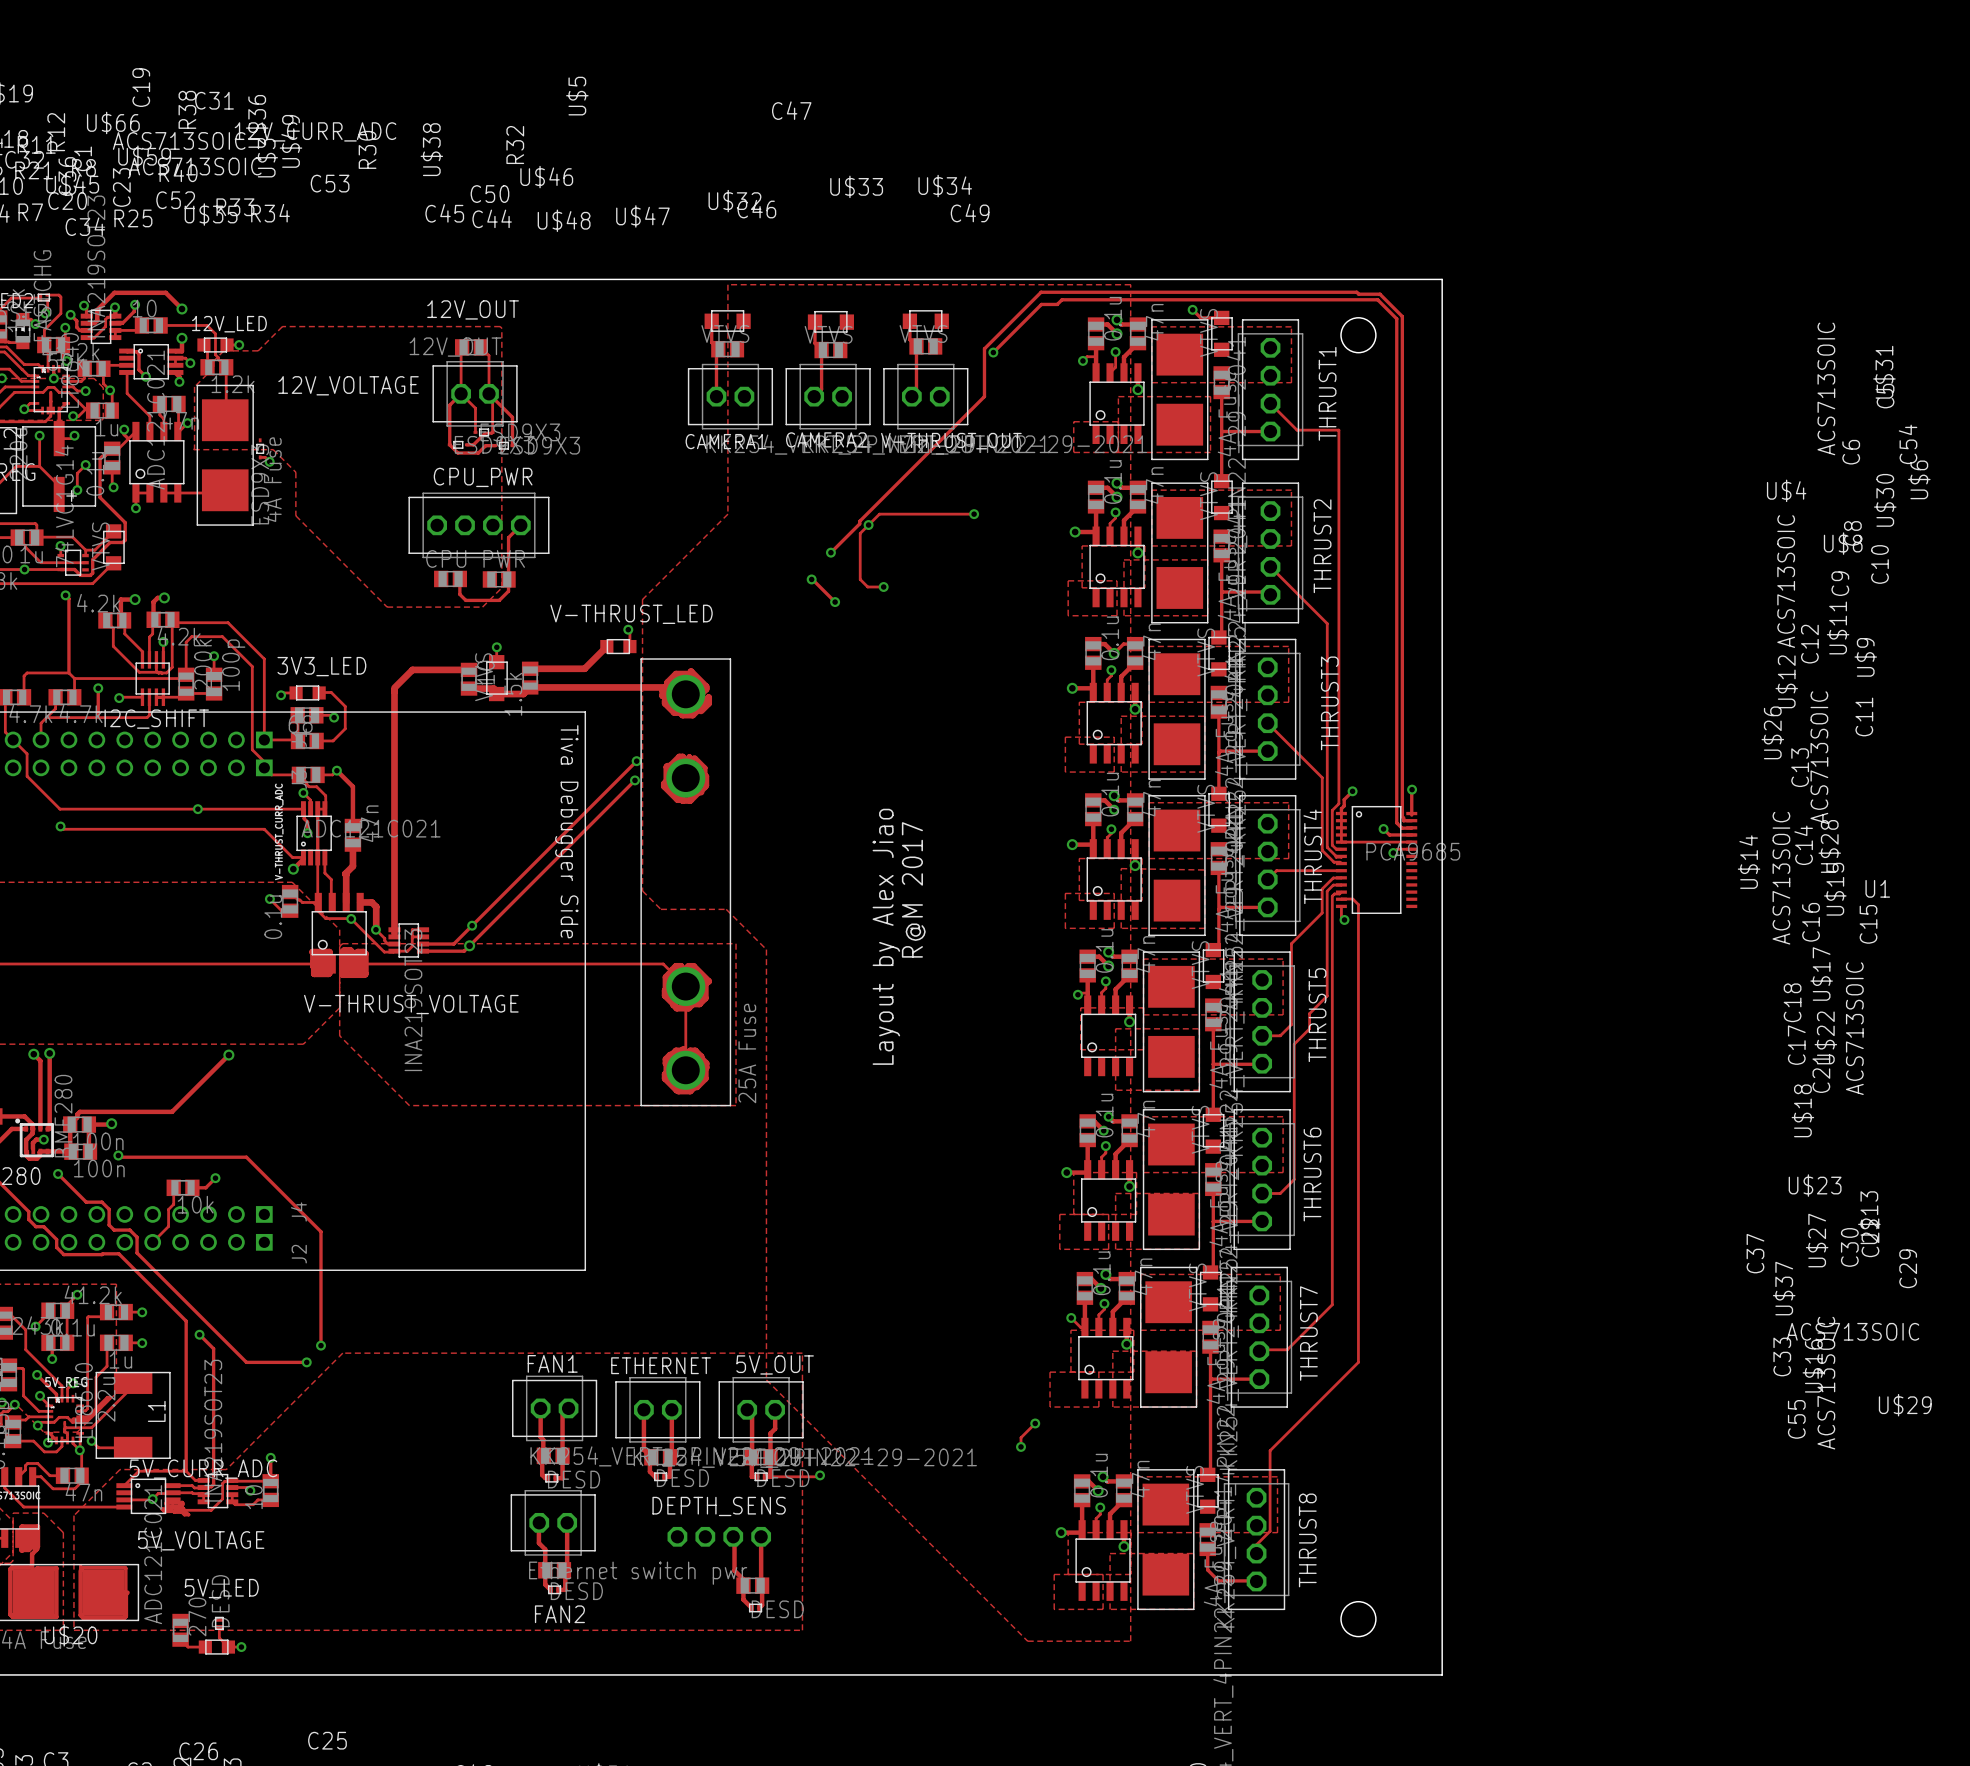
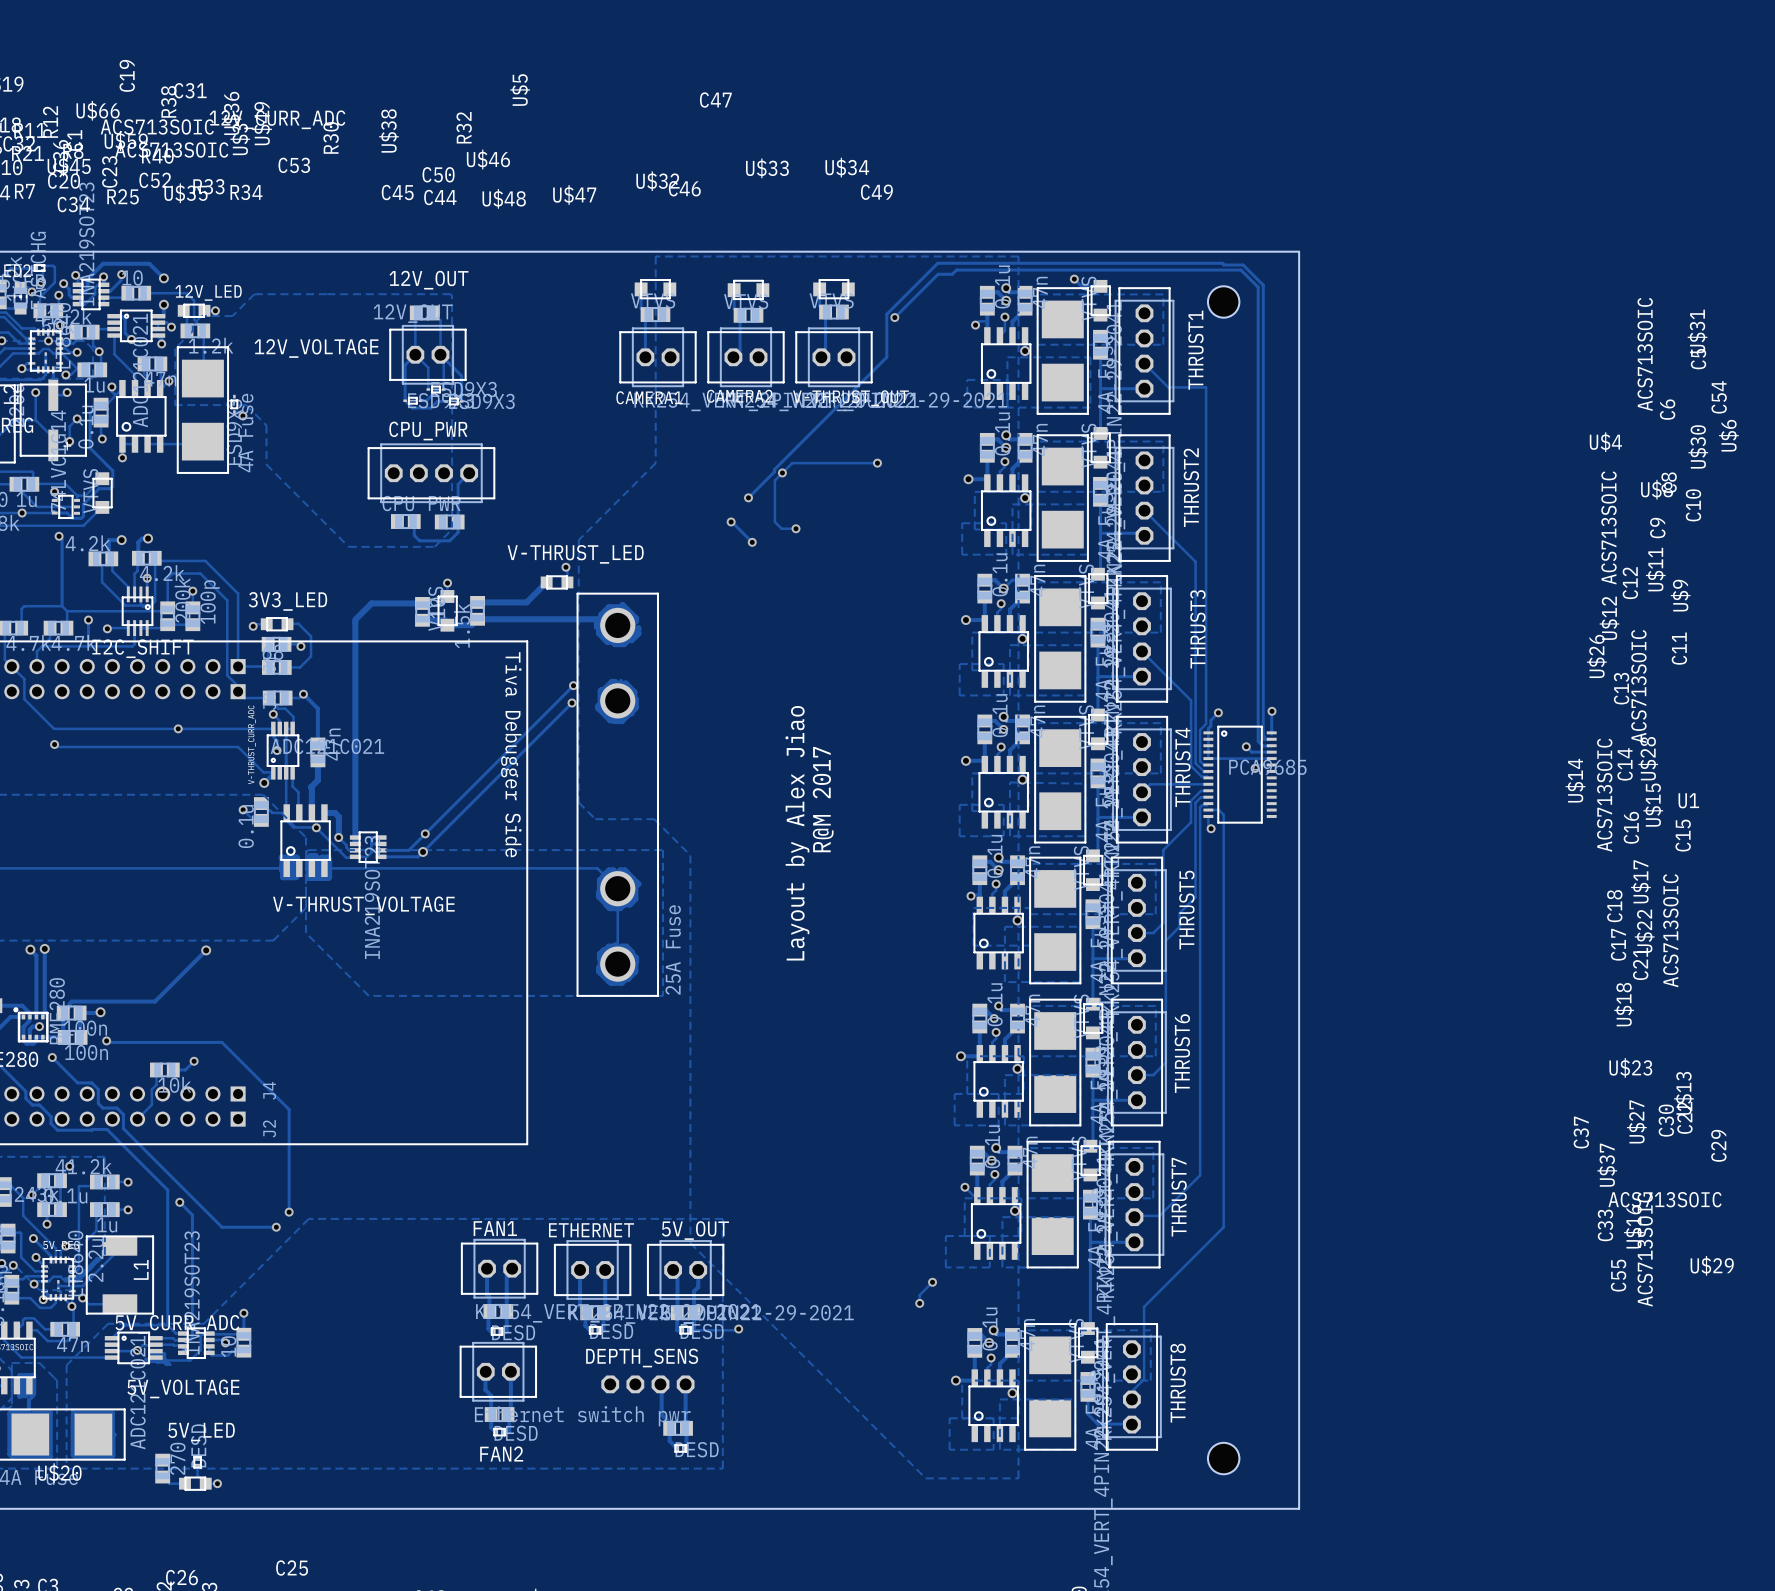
I2C_SHIFT footprint: [135, 651, 170, 707] -> [122, 586, 154, 636]

